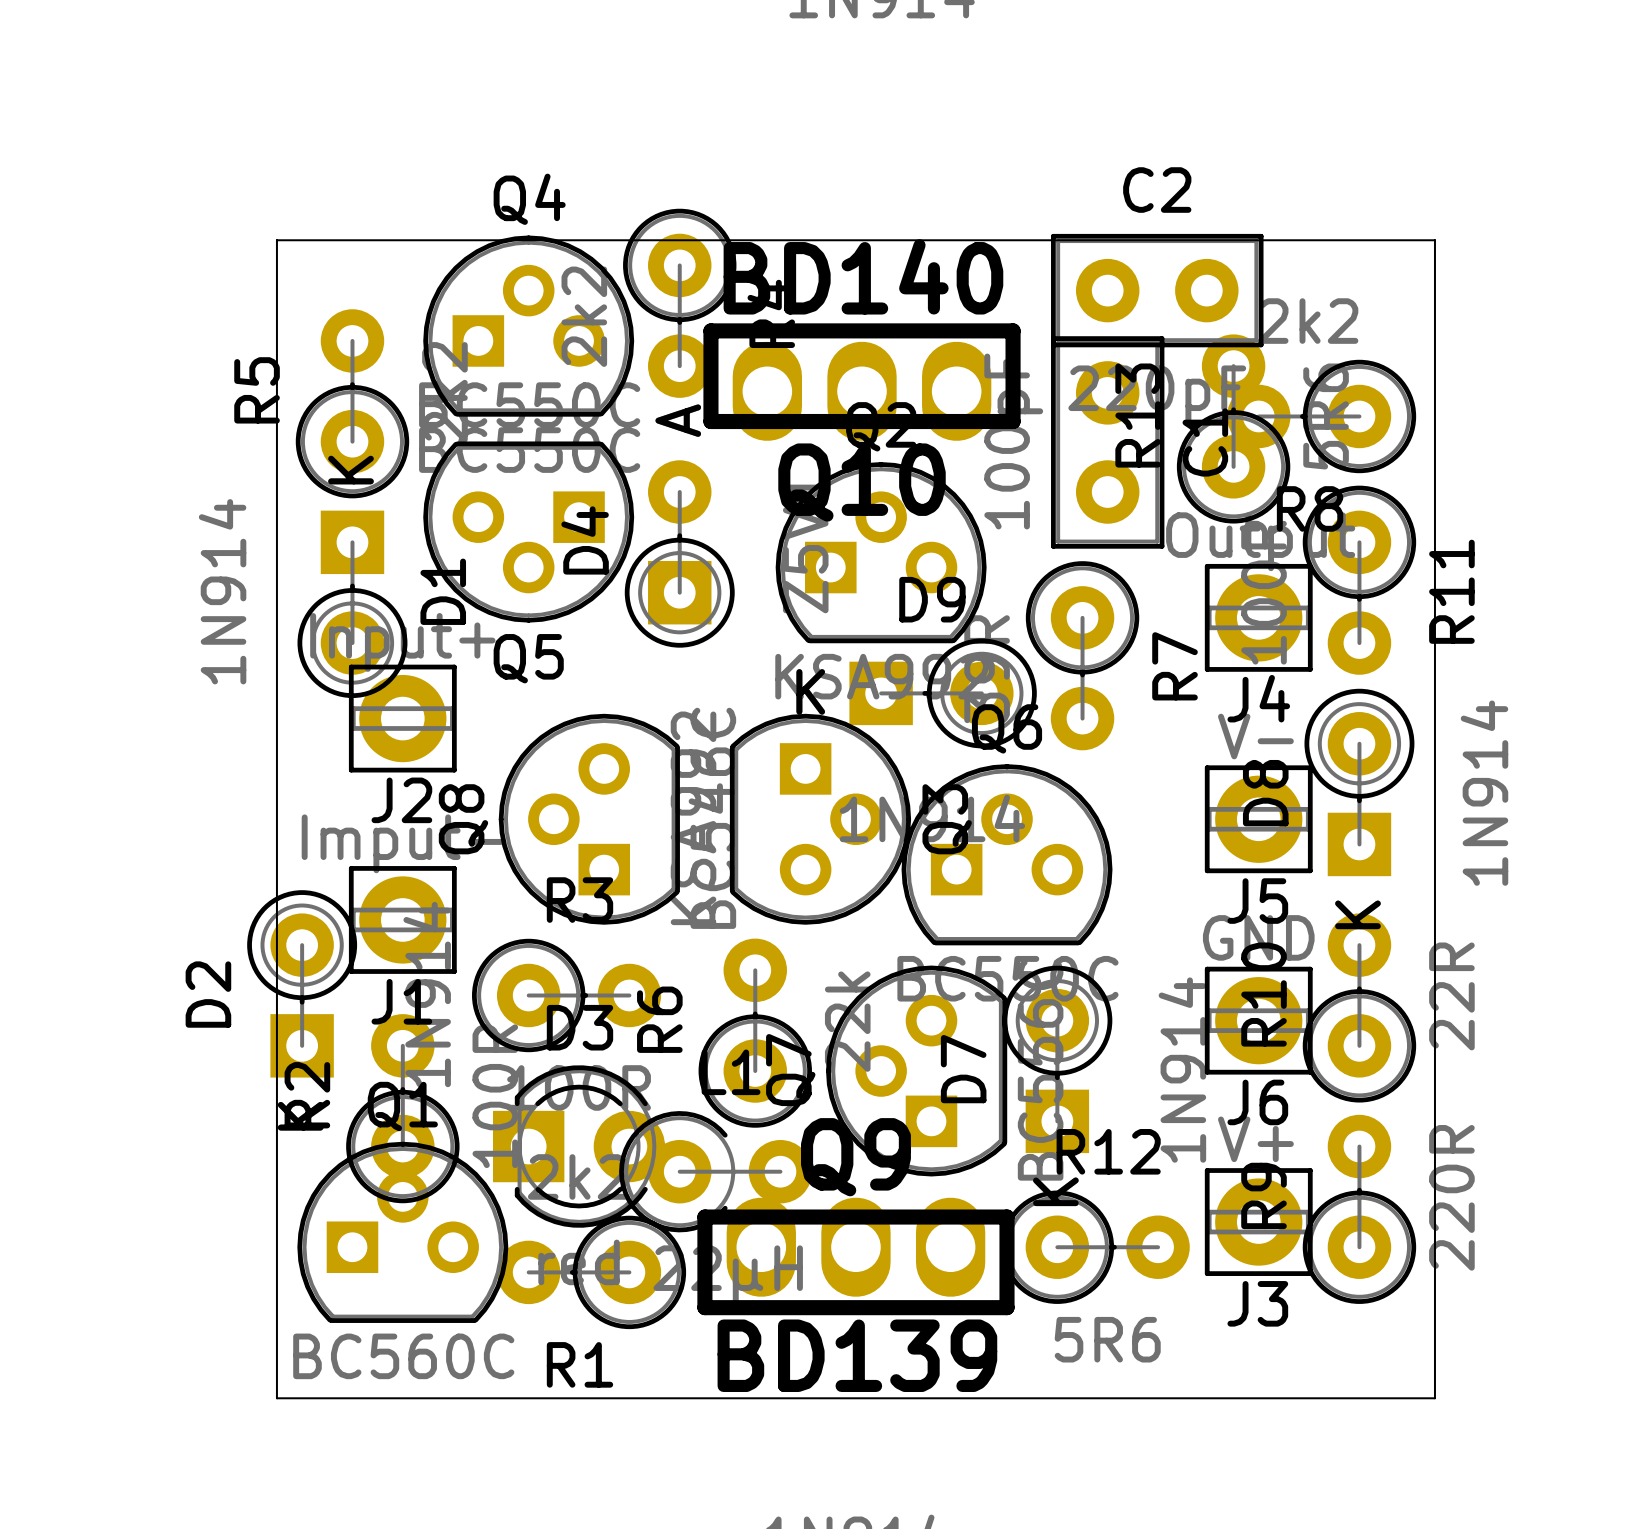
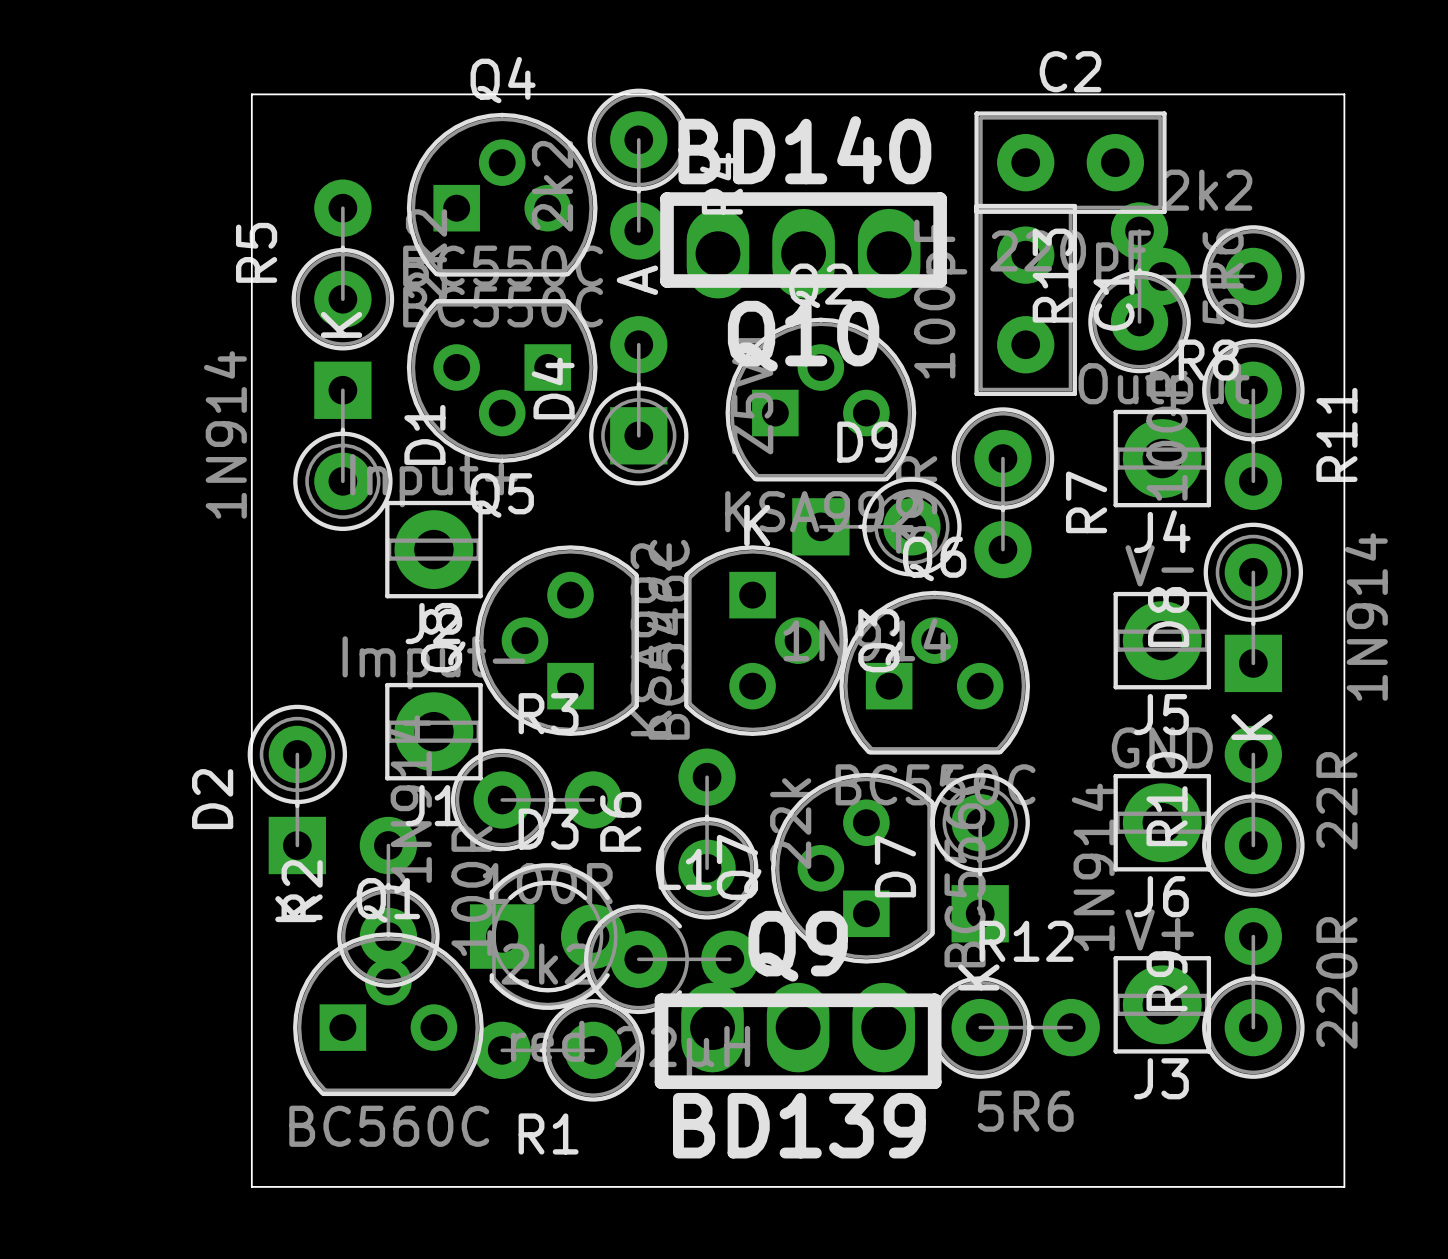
board edge: (276, 240) (1434, 240) (1434, 1398) (276, 1398) (276, 240) -> (251, 94) (251, 1186) (1344, 1186) (1344, 94) (251, 94)
J2 position: (402, 718) -> (433, 549)
J1 position: (402, 919) -> (433, 731)

